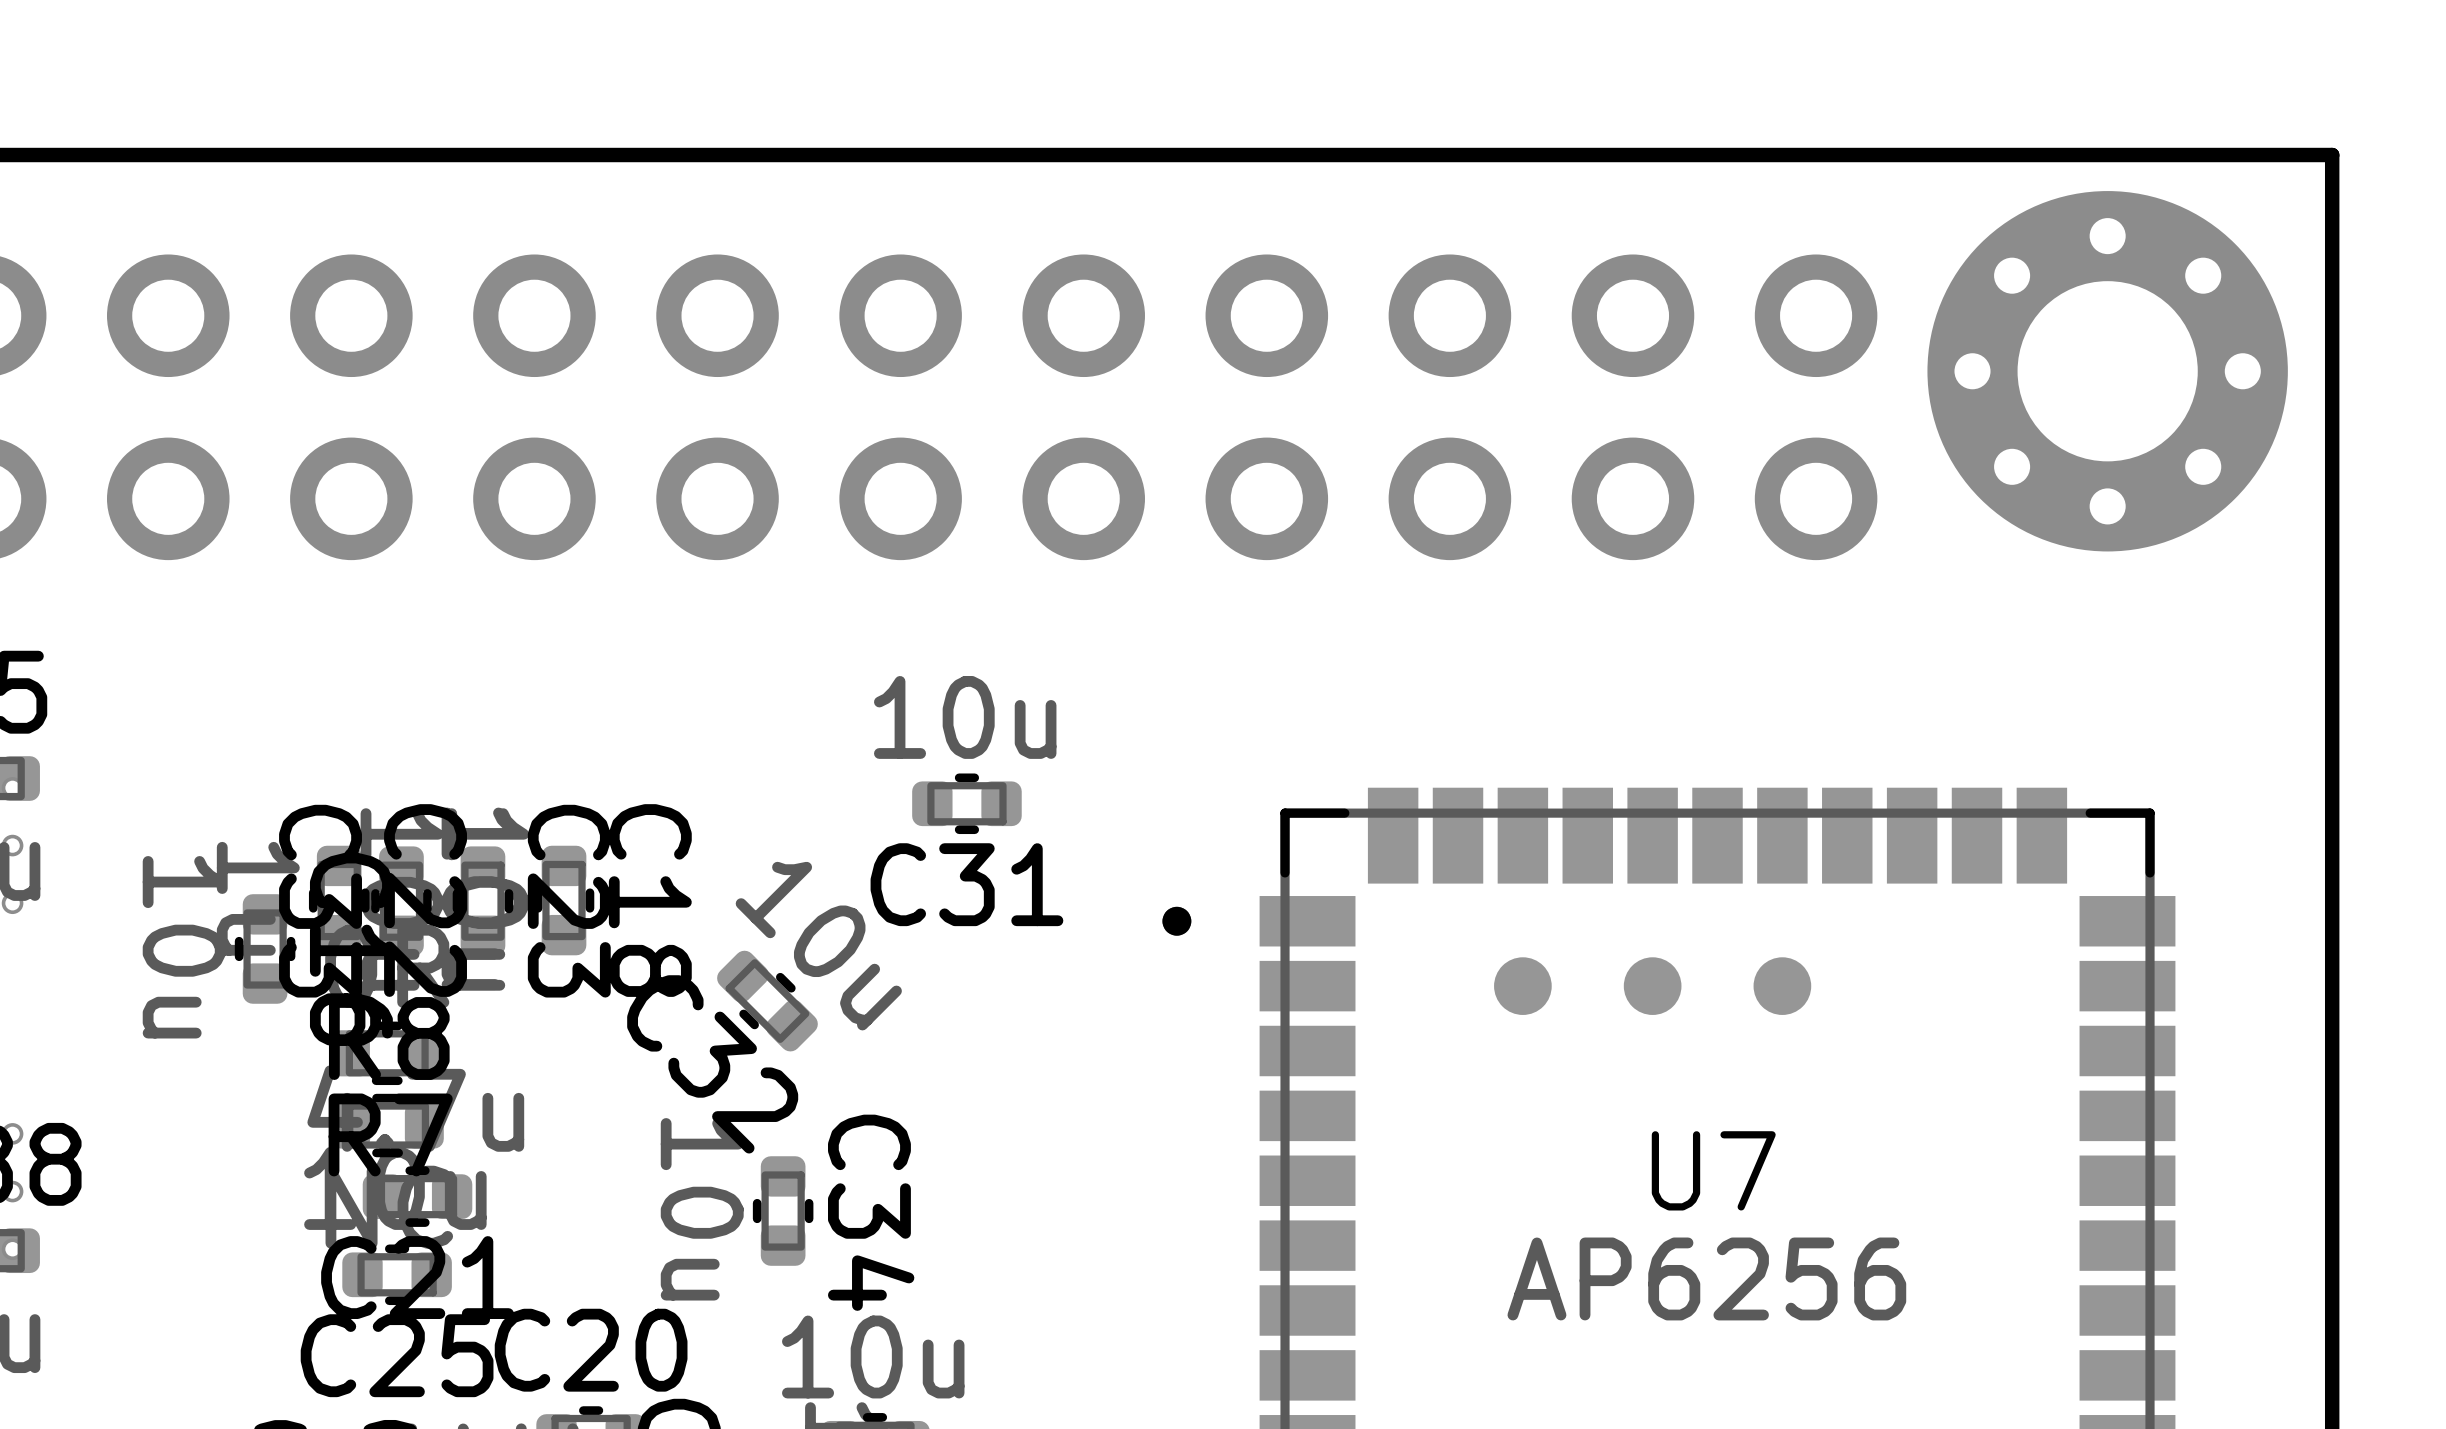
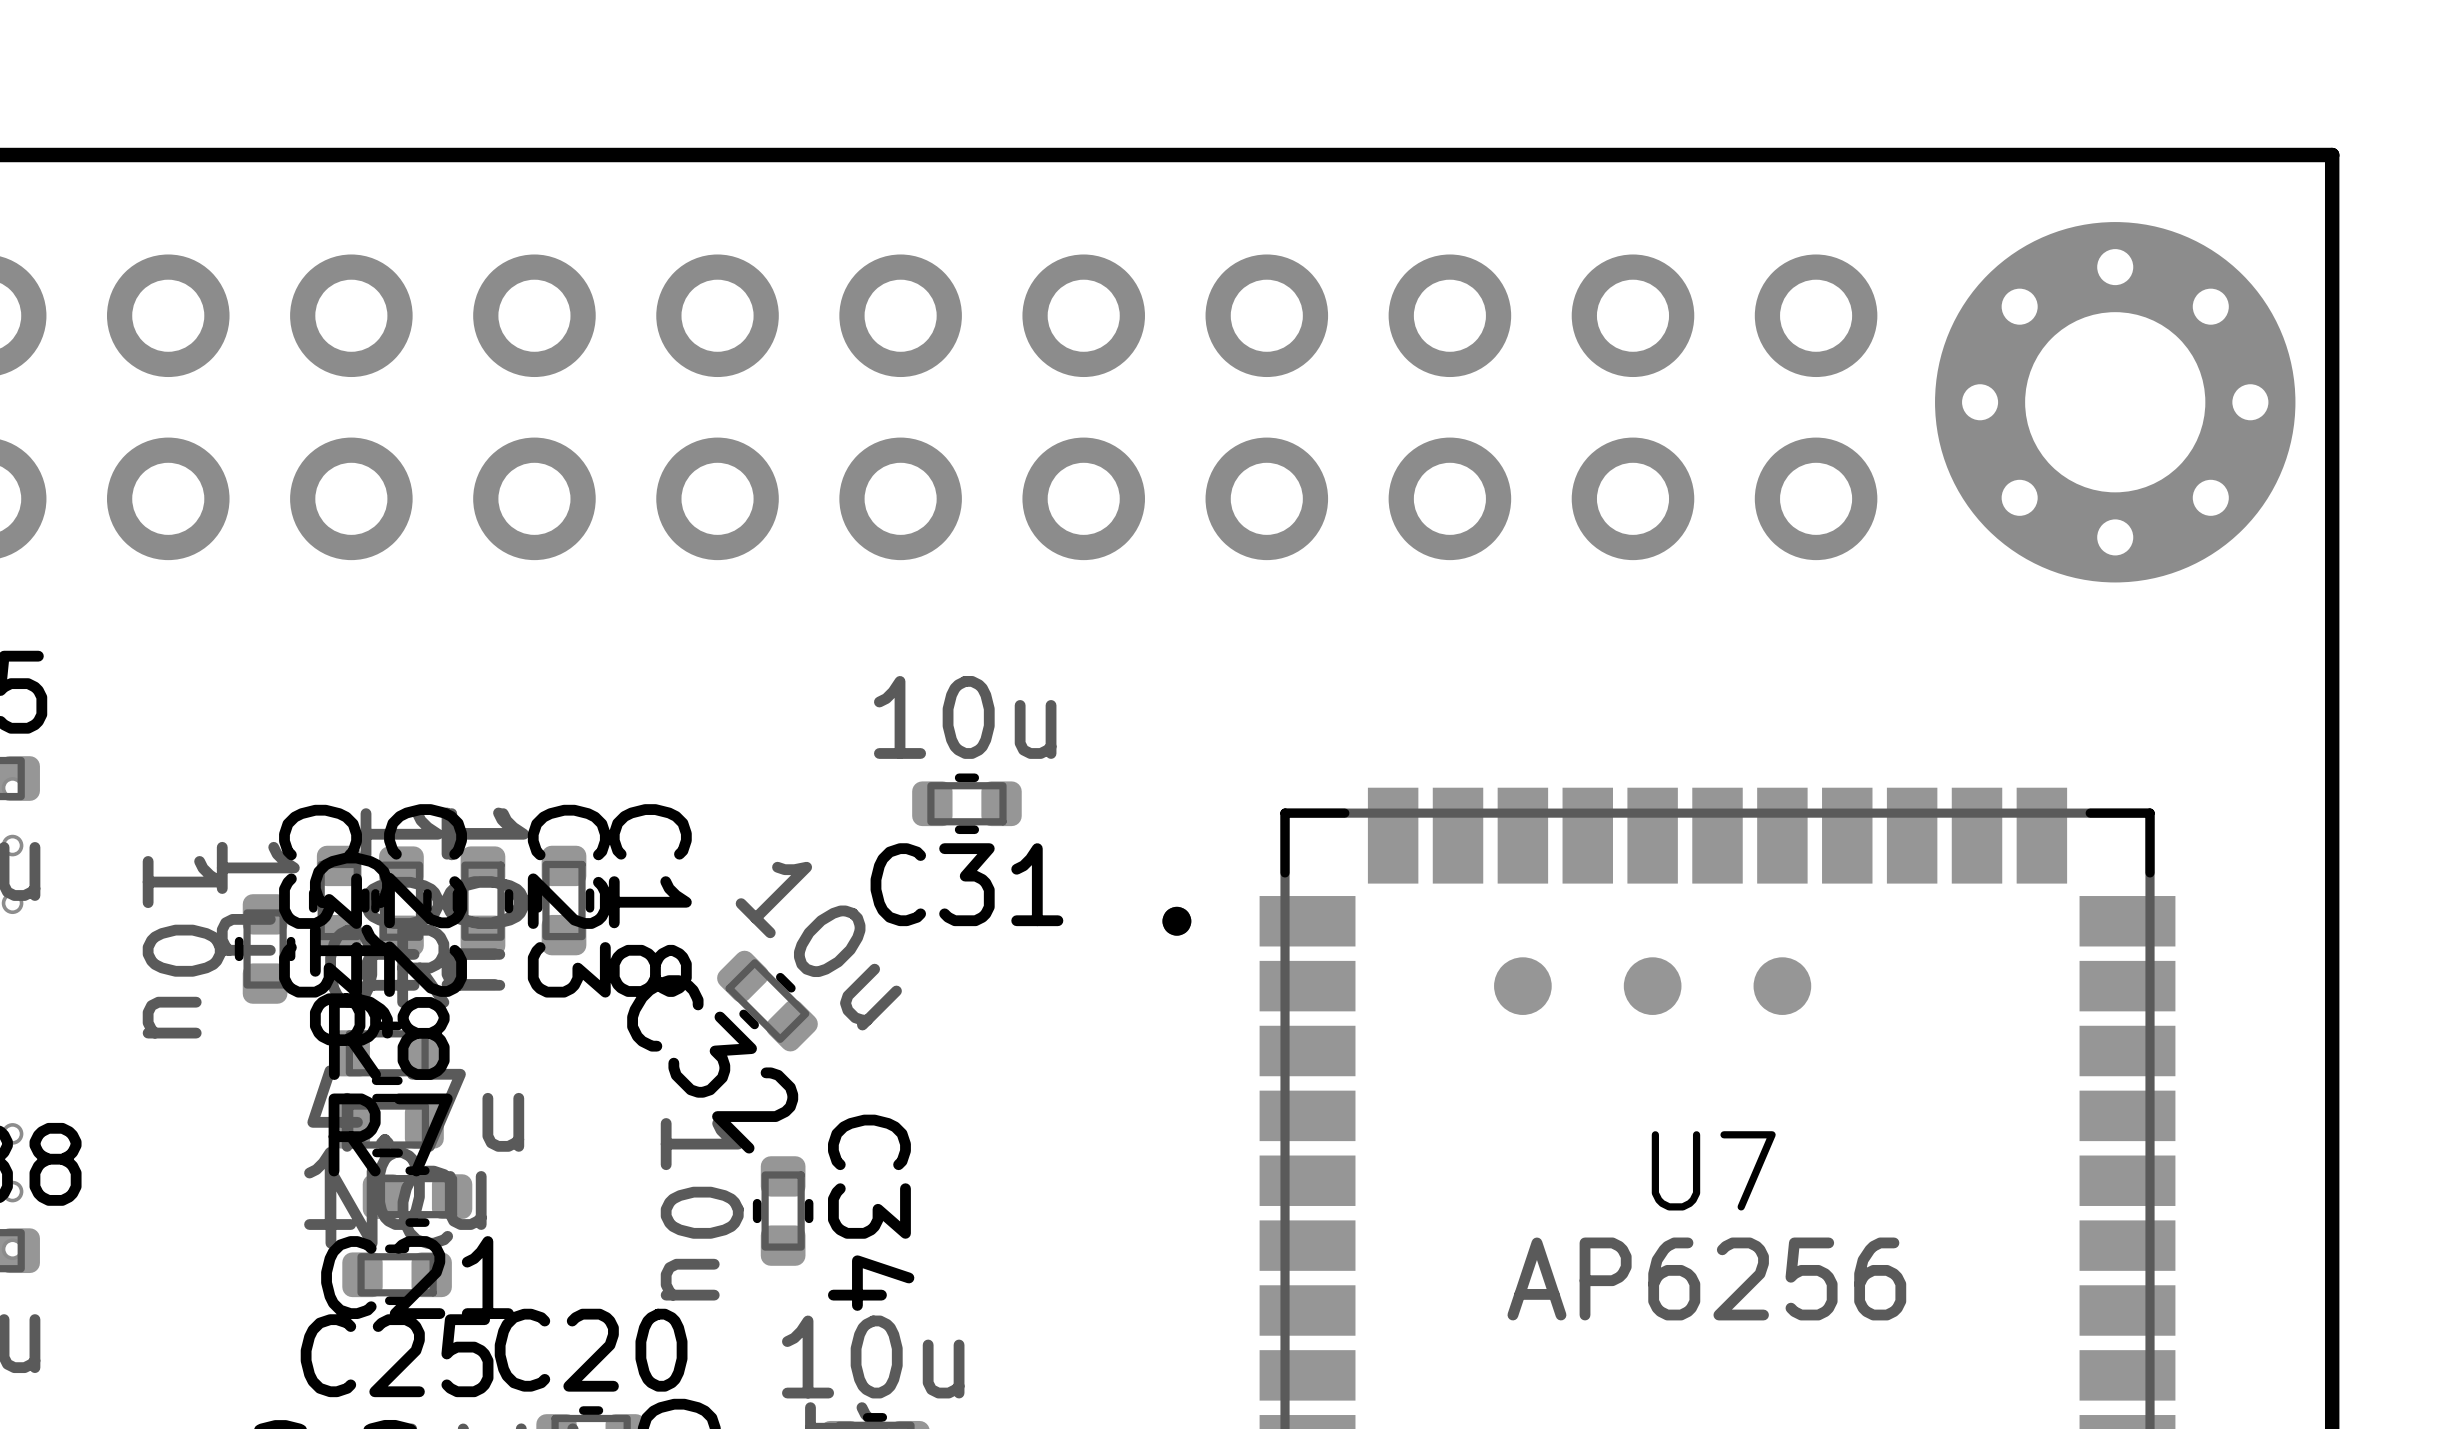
part position: (2107, 371) -> (2115, 402)

